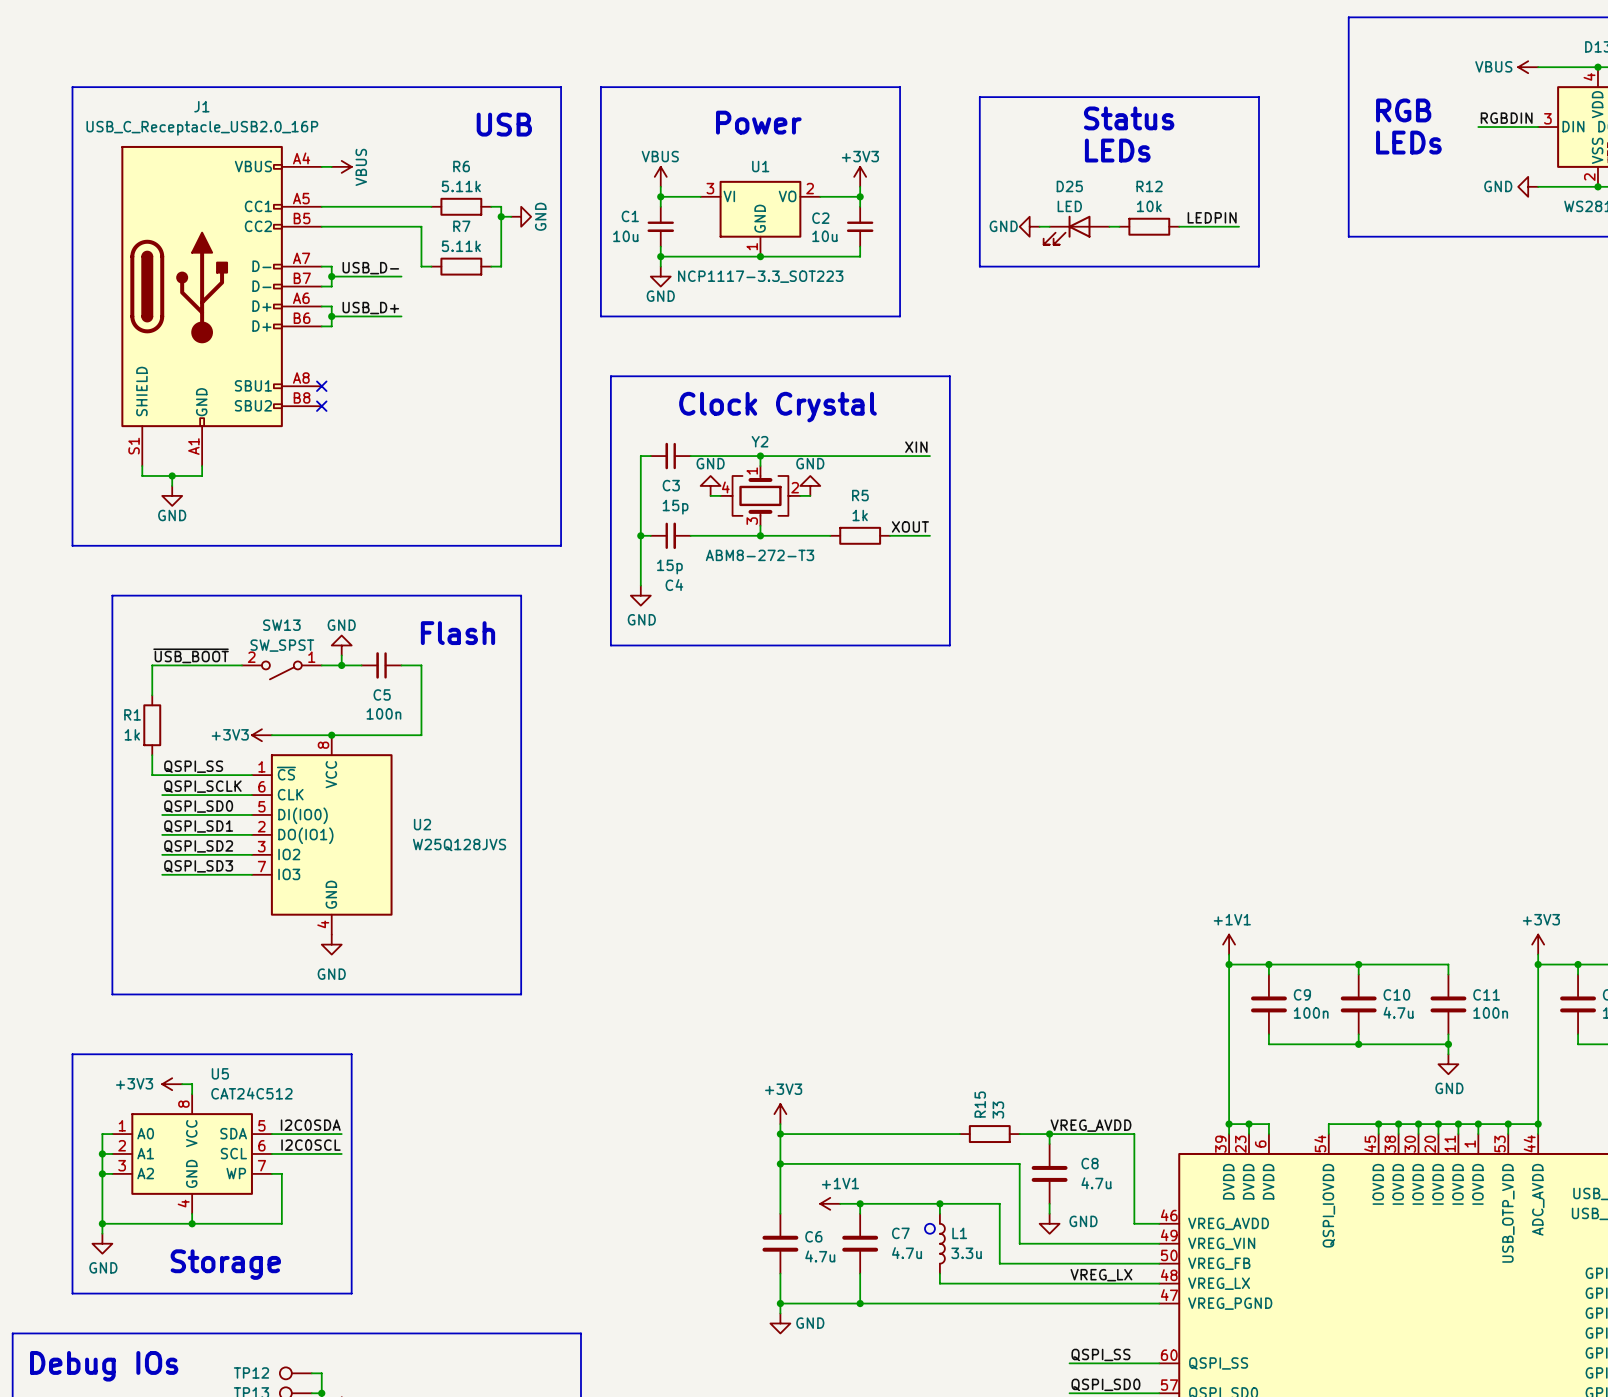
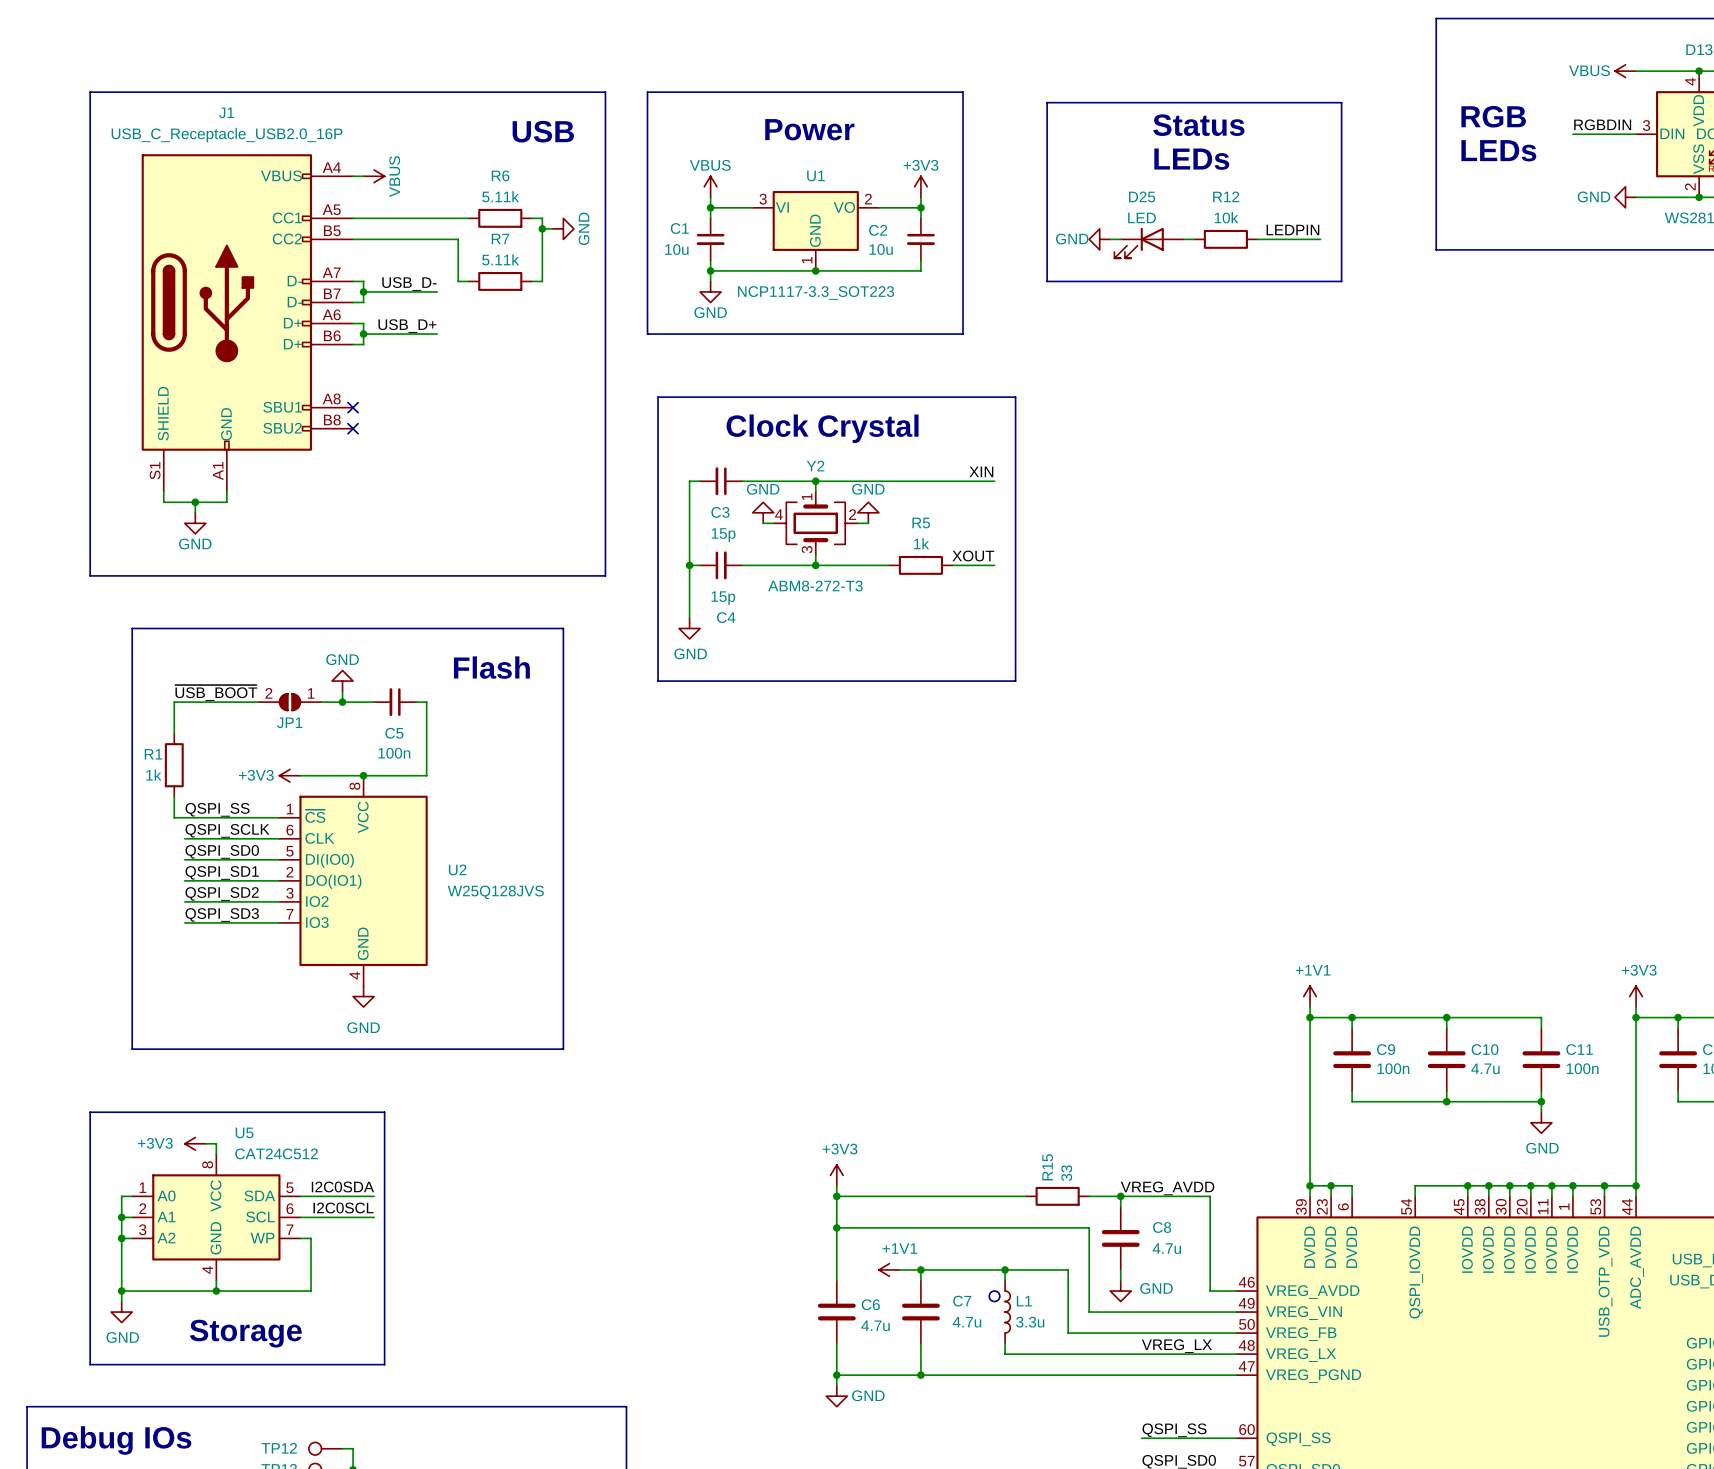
power symbol position: GND (341, 645) -> GND (342, 681)
wire: none -> (342, 691) (342, 702)
JP1: none -> (289, 702)
junction position: (341, 665) -> (342, 702)
C5 position: (381, 665) -> (395, 702)
wire: (401, 665) (421, 665) (421, 735) (391, 735) -> (416, 702) (426, 702) (426, 775)
SW13: SW_SPST (281, 670) -> none

